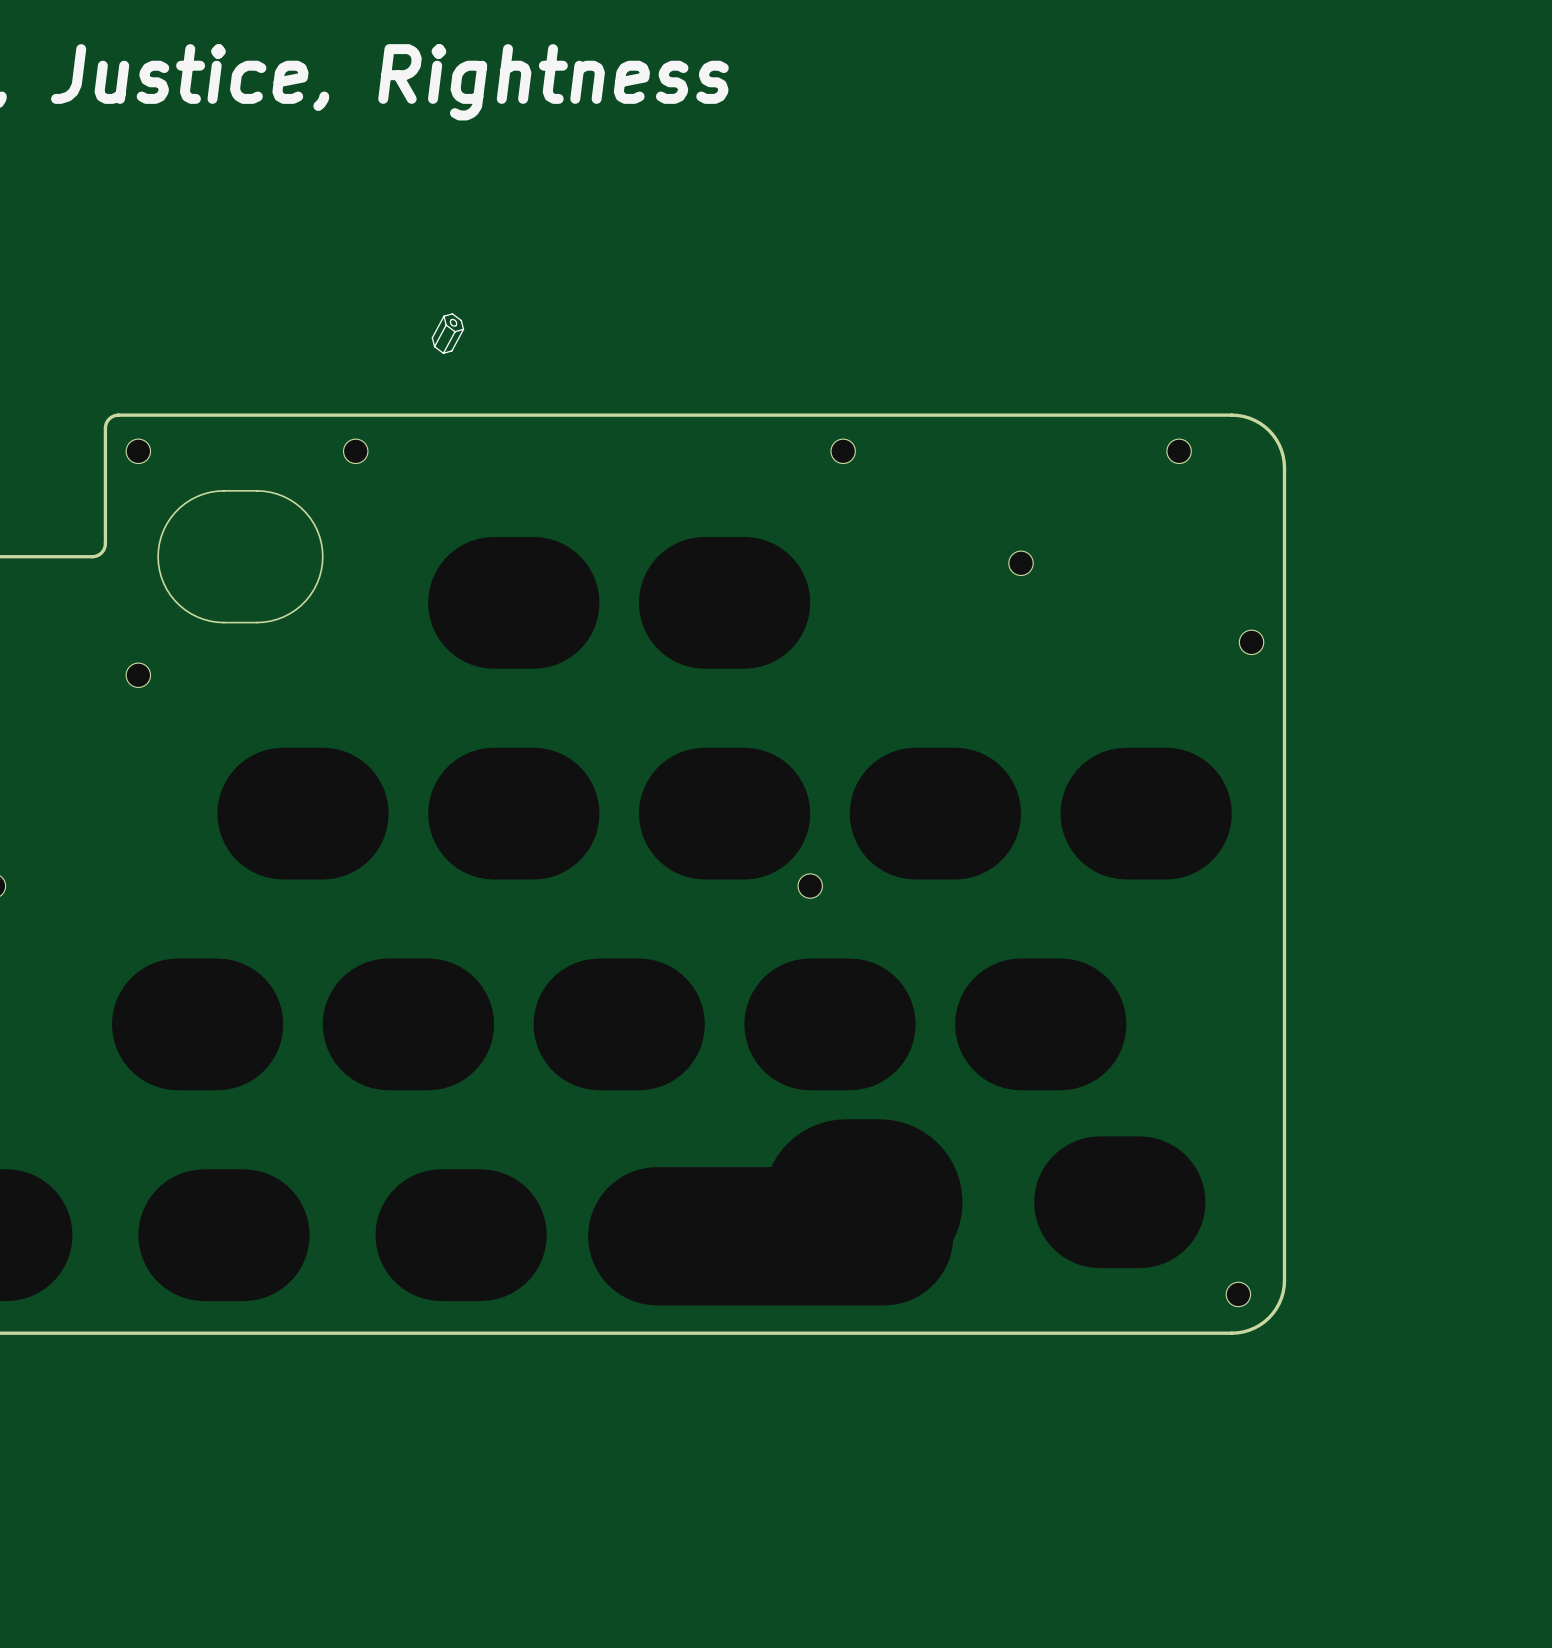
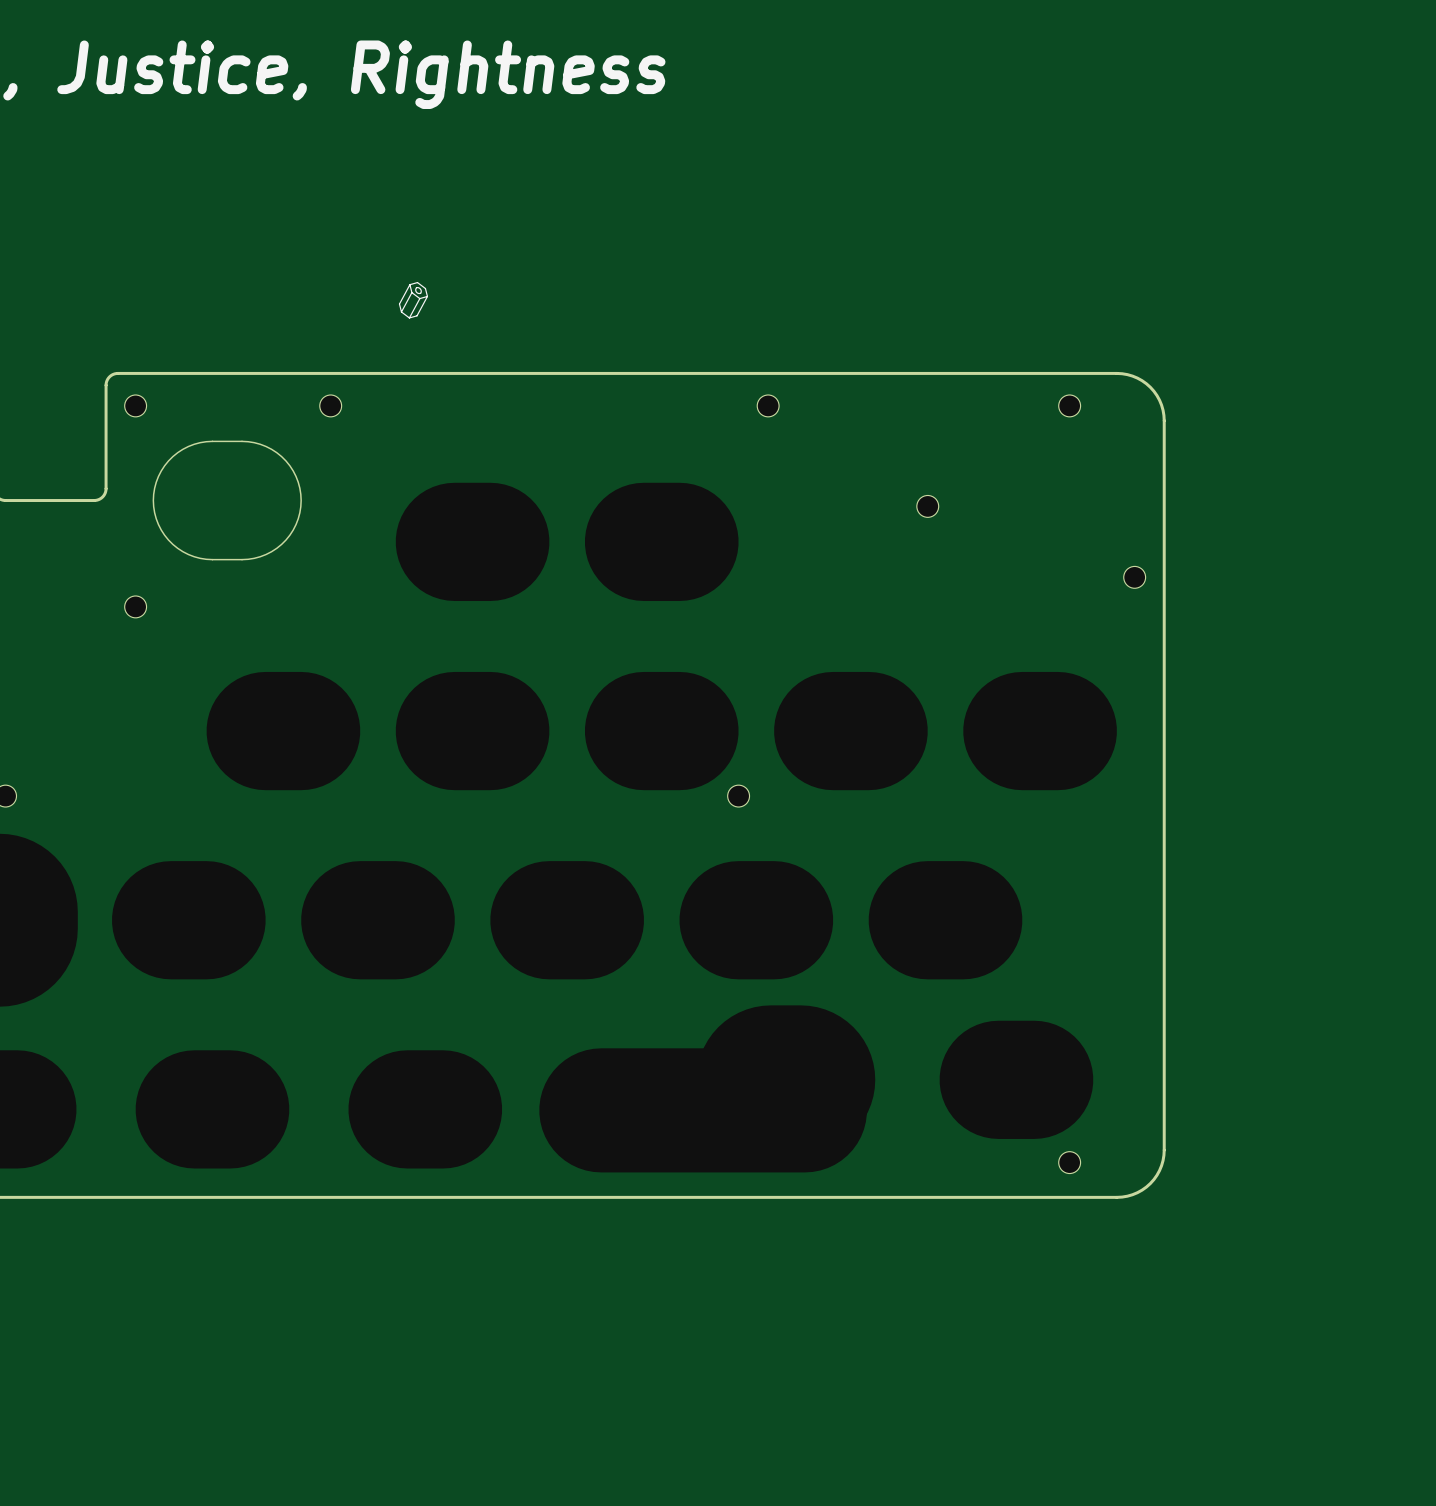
part position: (1238, 1294) -> (1069, 1162)

